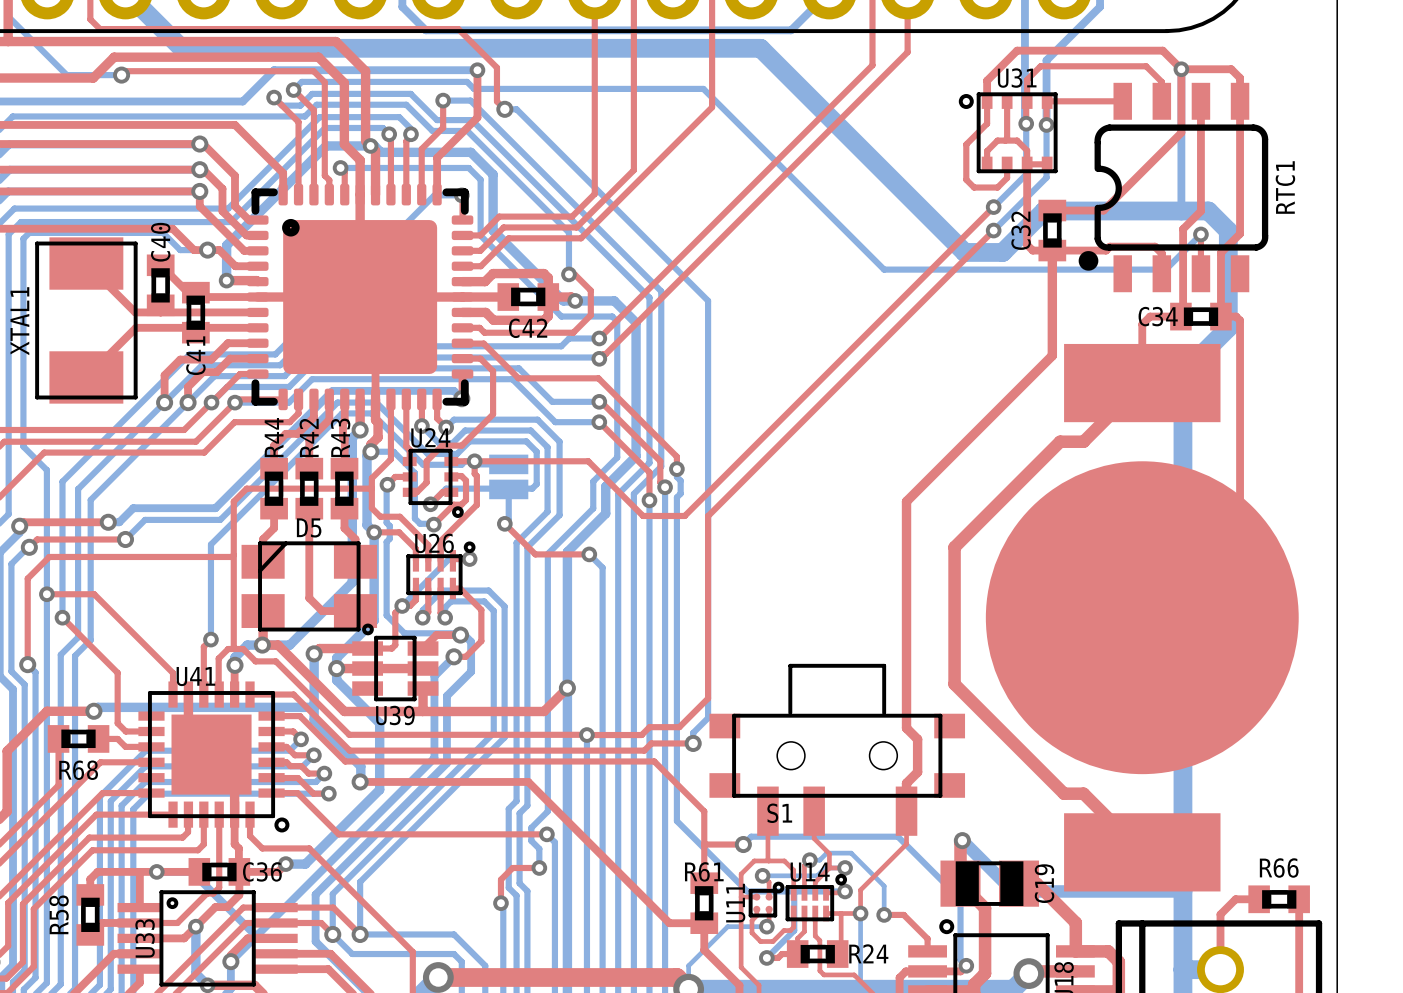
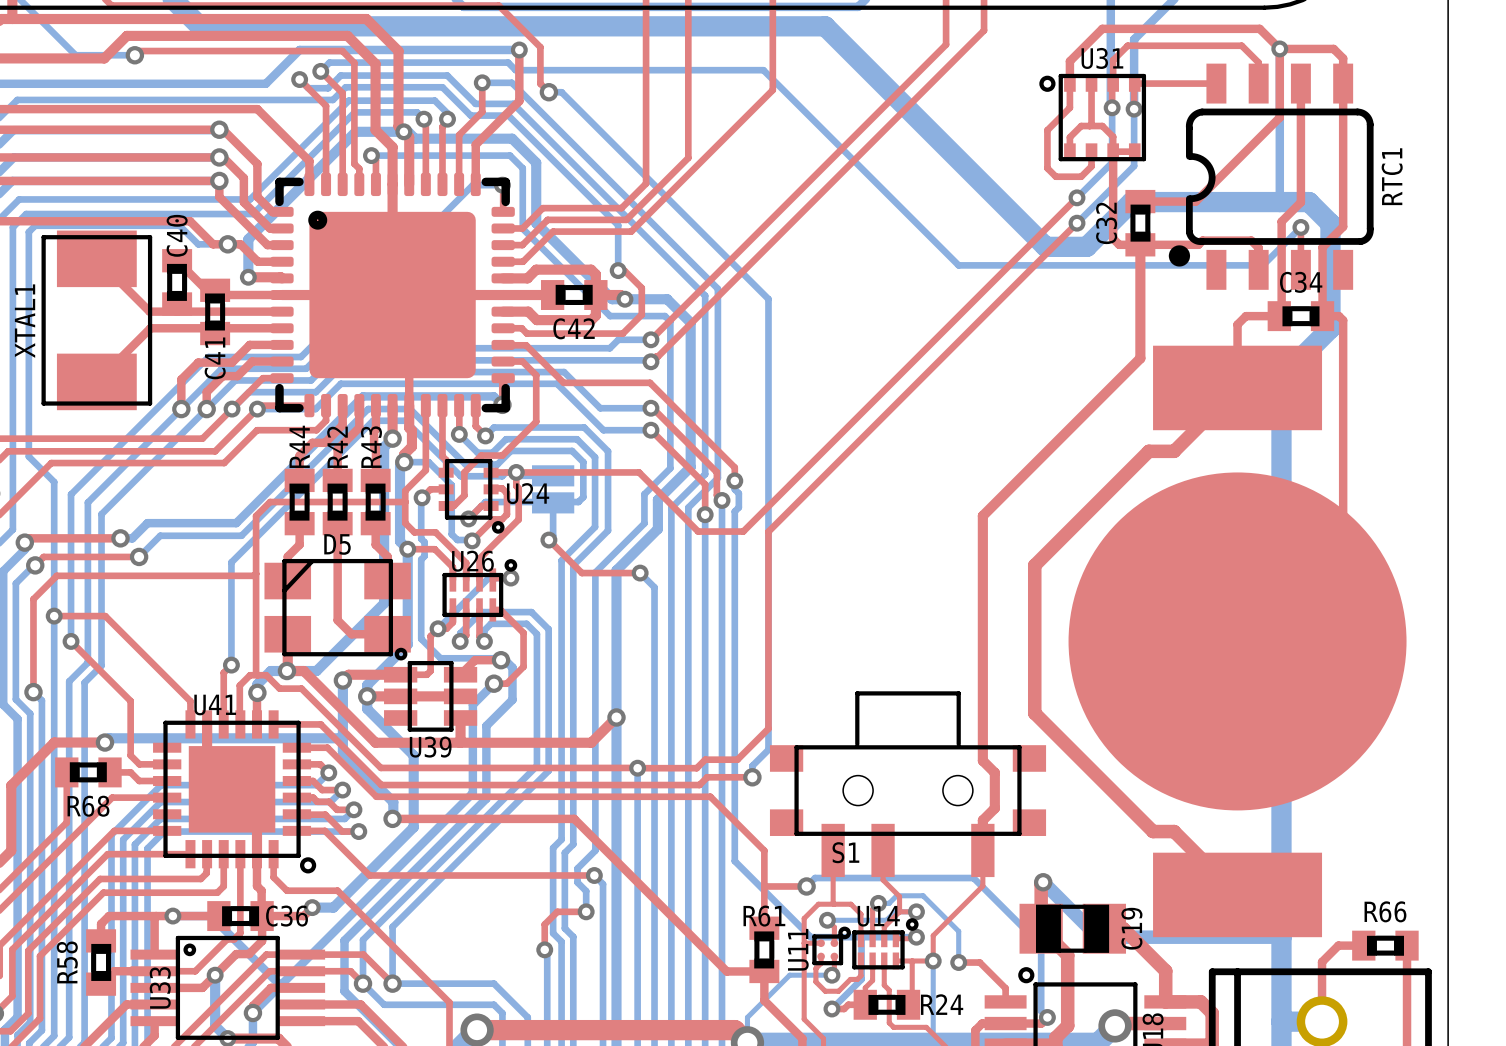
C34 name position: C34 (1158, 316) -> C34 (1301, 282)
U24 name position: U24 (430, 437) -> U24 (528, 493)

